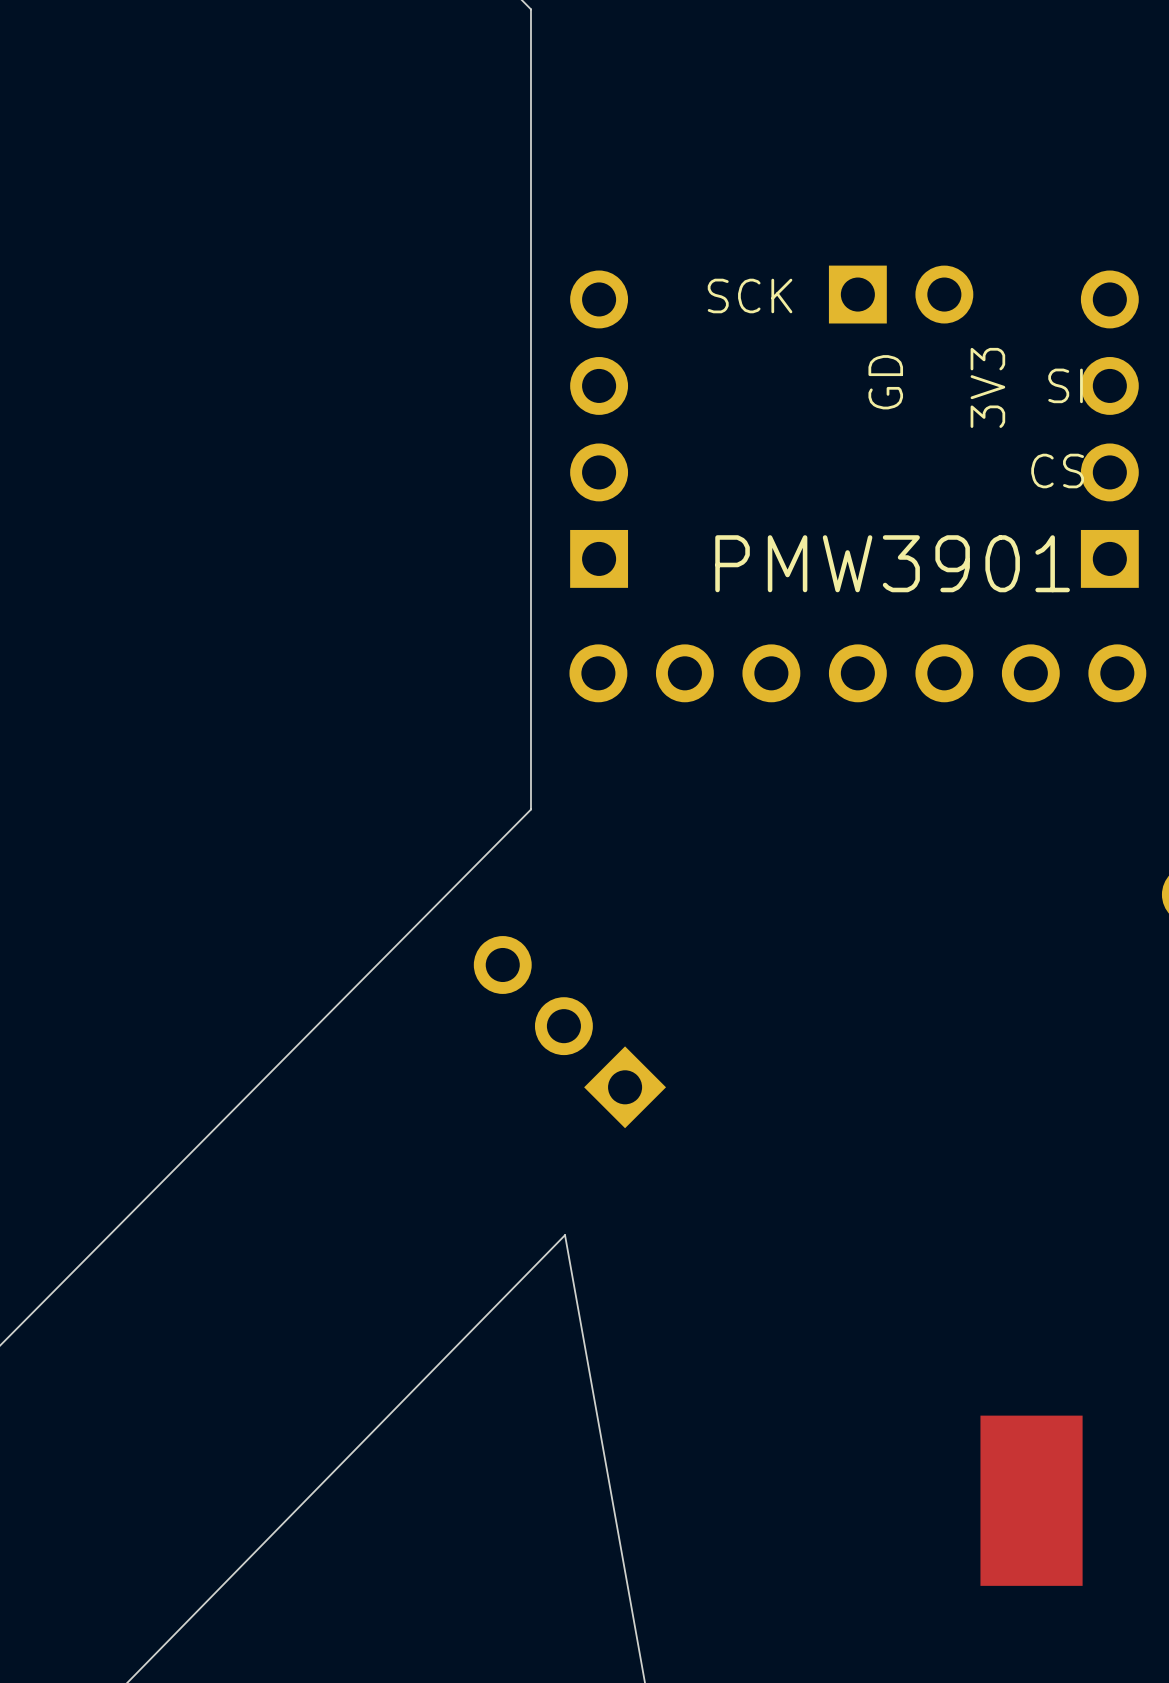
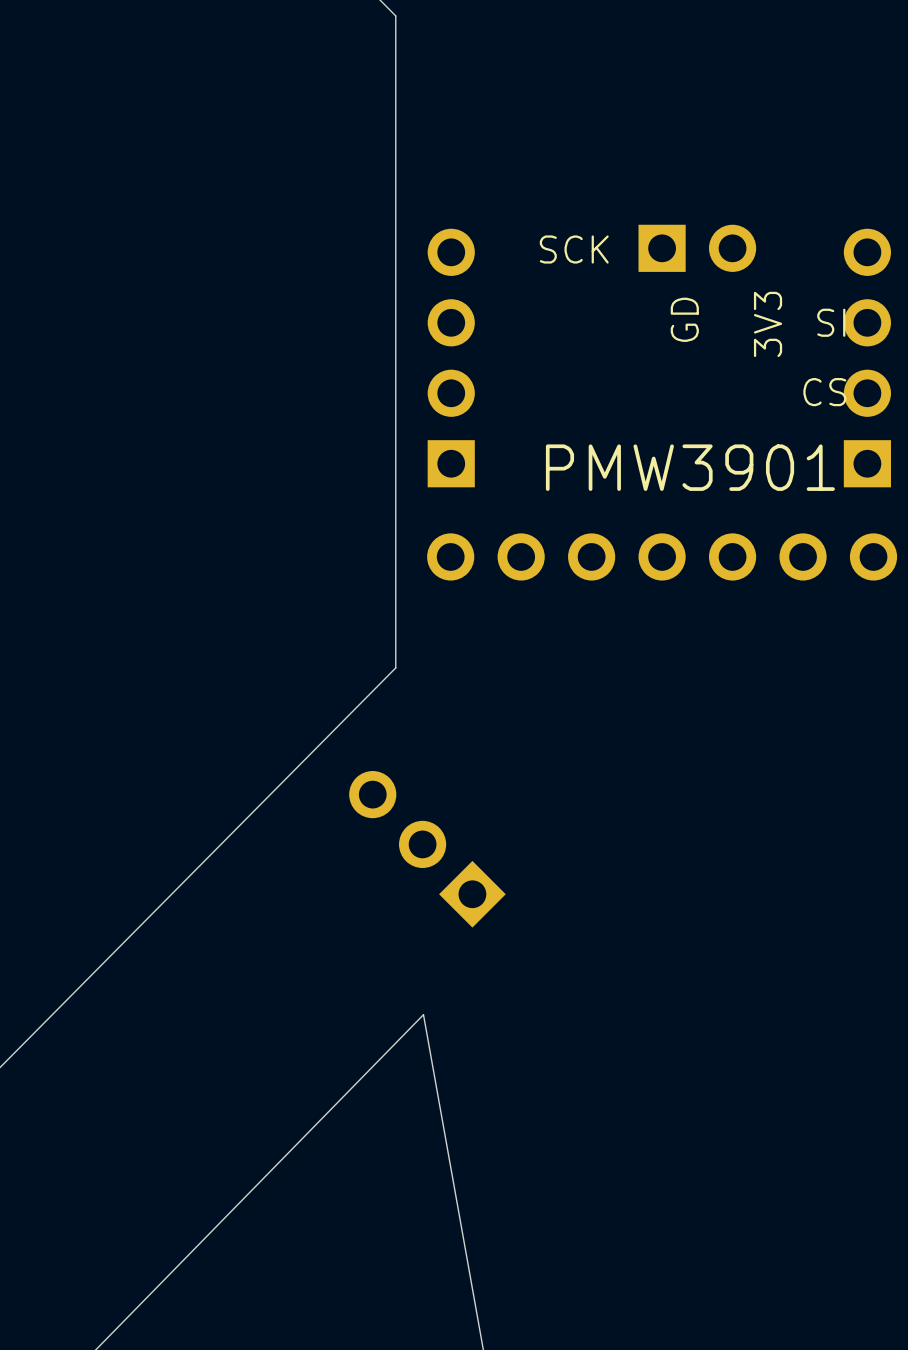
part: (1031, 1500) -> none

